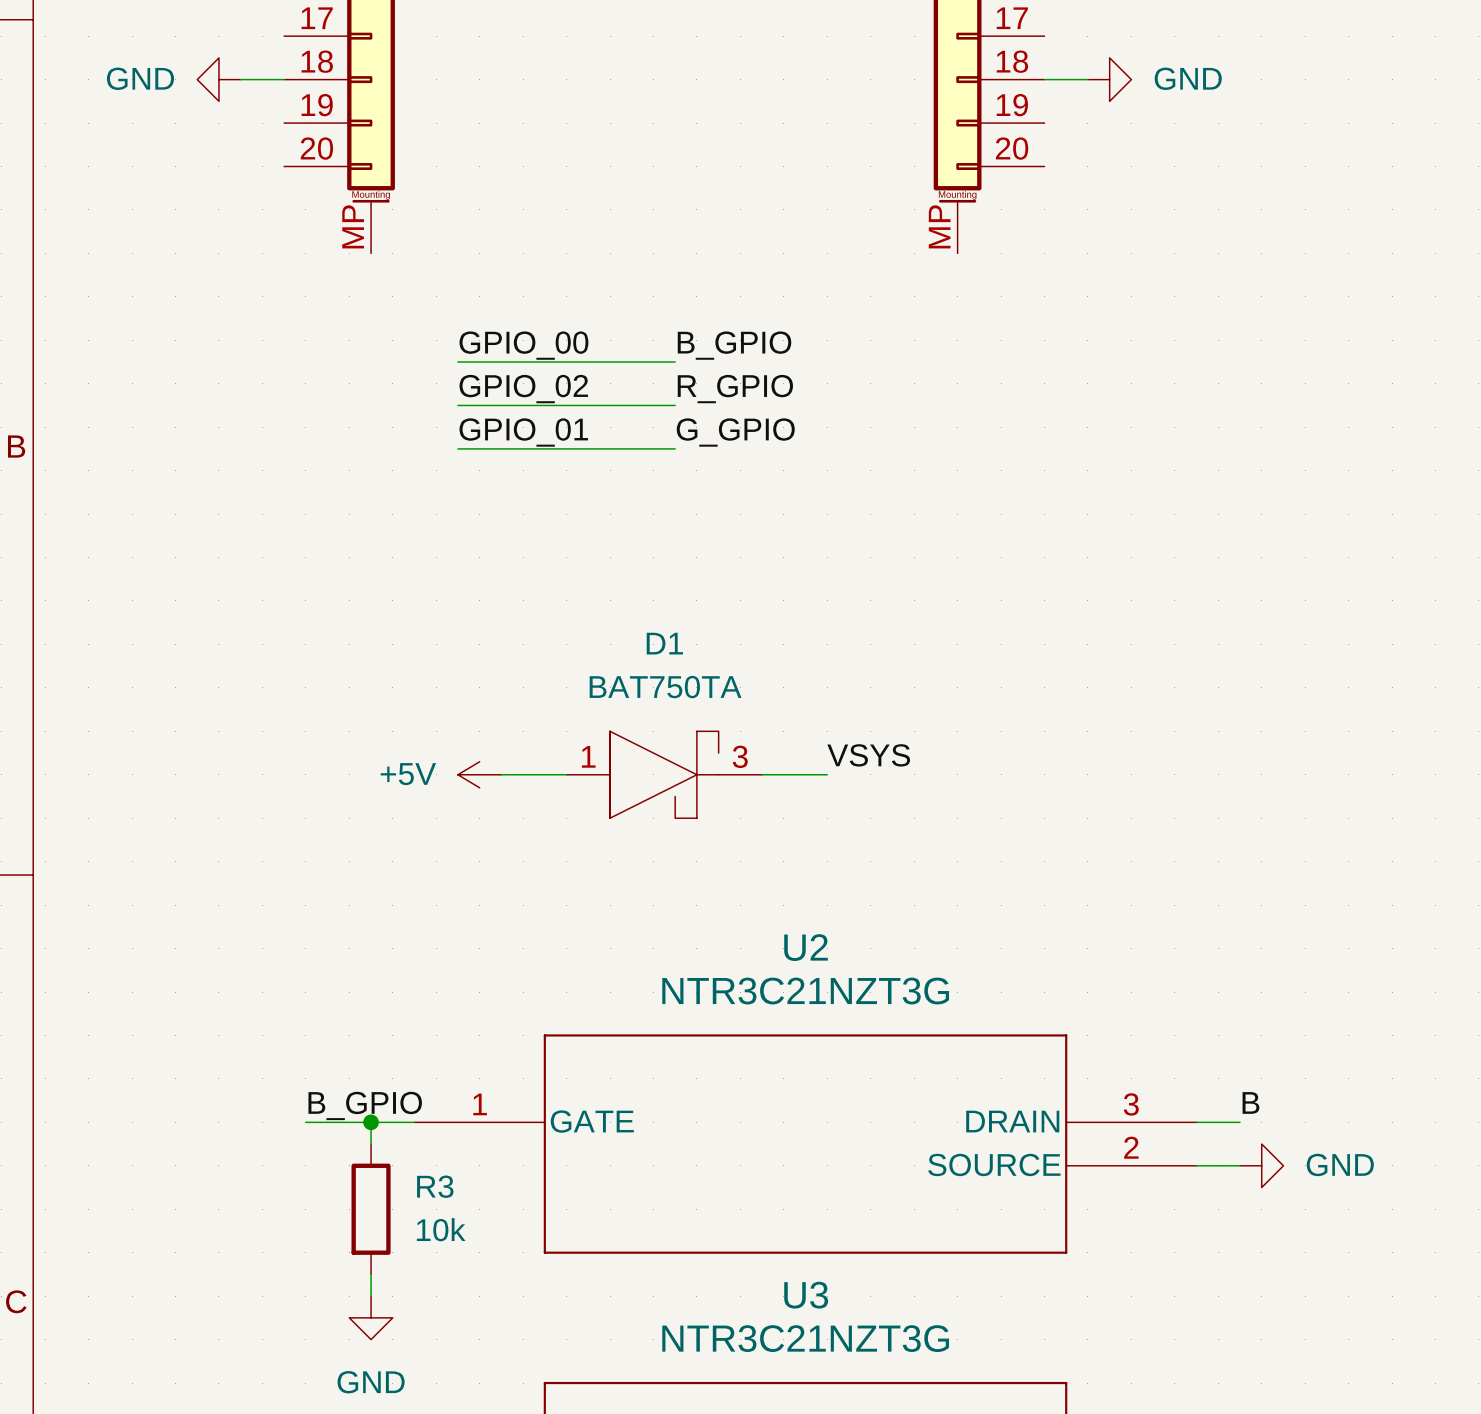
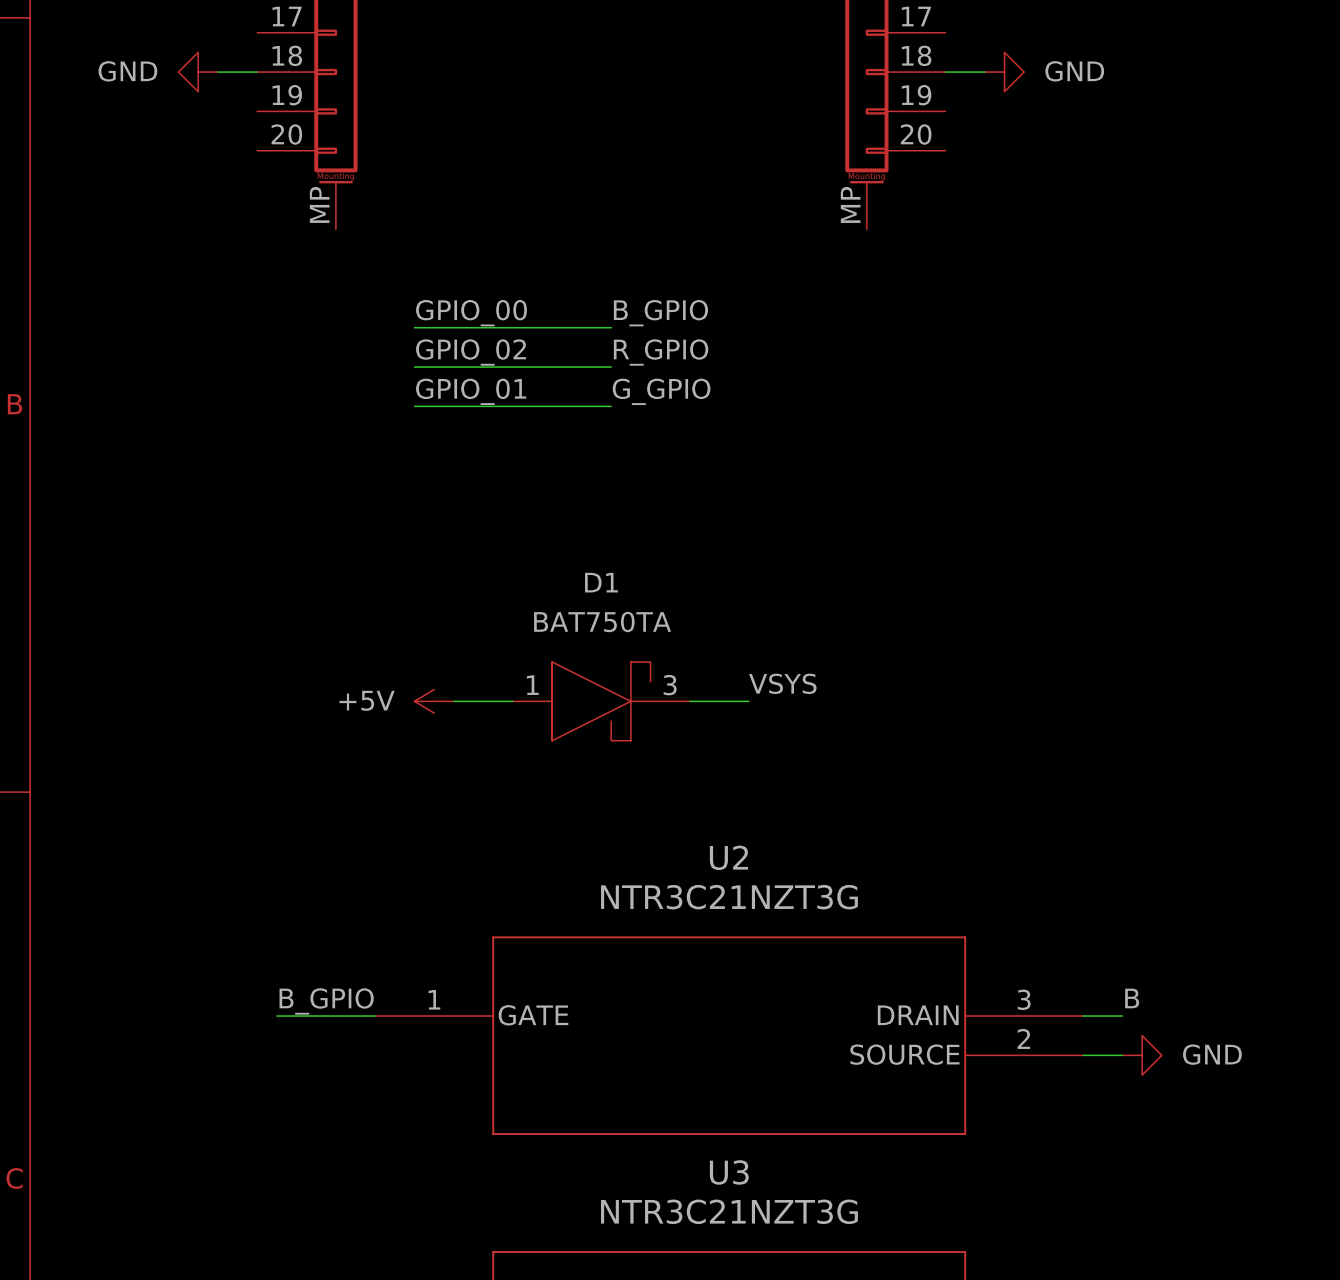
wire: (371, 1122) (371, 1144) -> none
junction: (371, 1122) -> none
R3: 10k (371, 1209) -> none
wire: (371, 1274) (371, 1296) -> none
power symbol: GND (371, 1317) -> none

